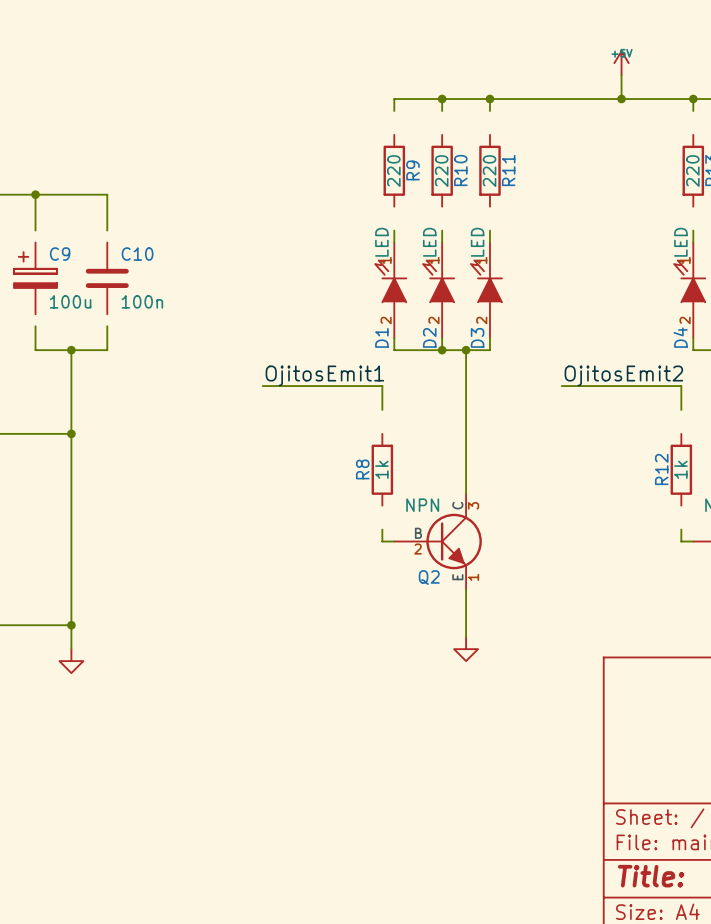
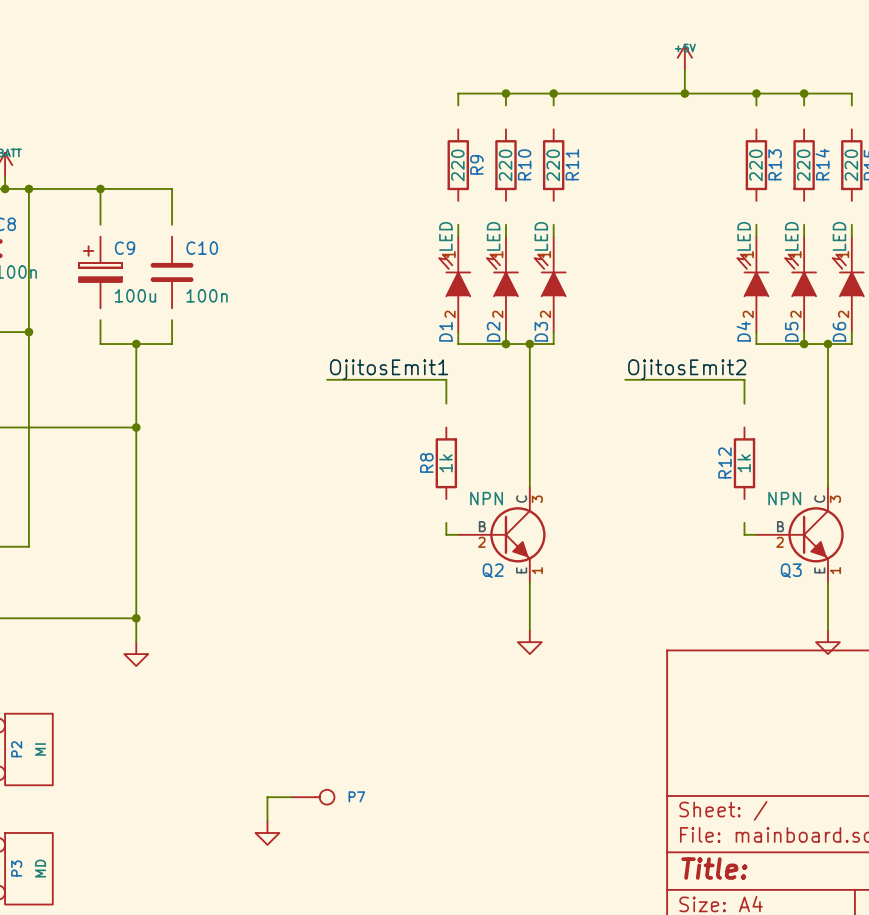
wire: none -> (291, 797) (267, 797) (267, 821)
P7: none -> (312, 797)
power symbol: none -> (267, 832)

